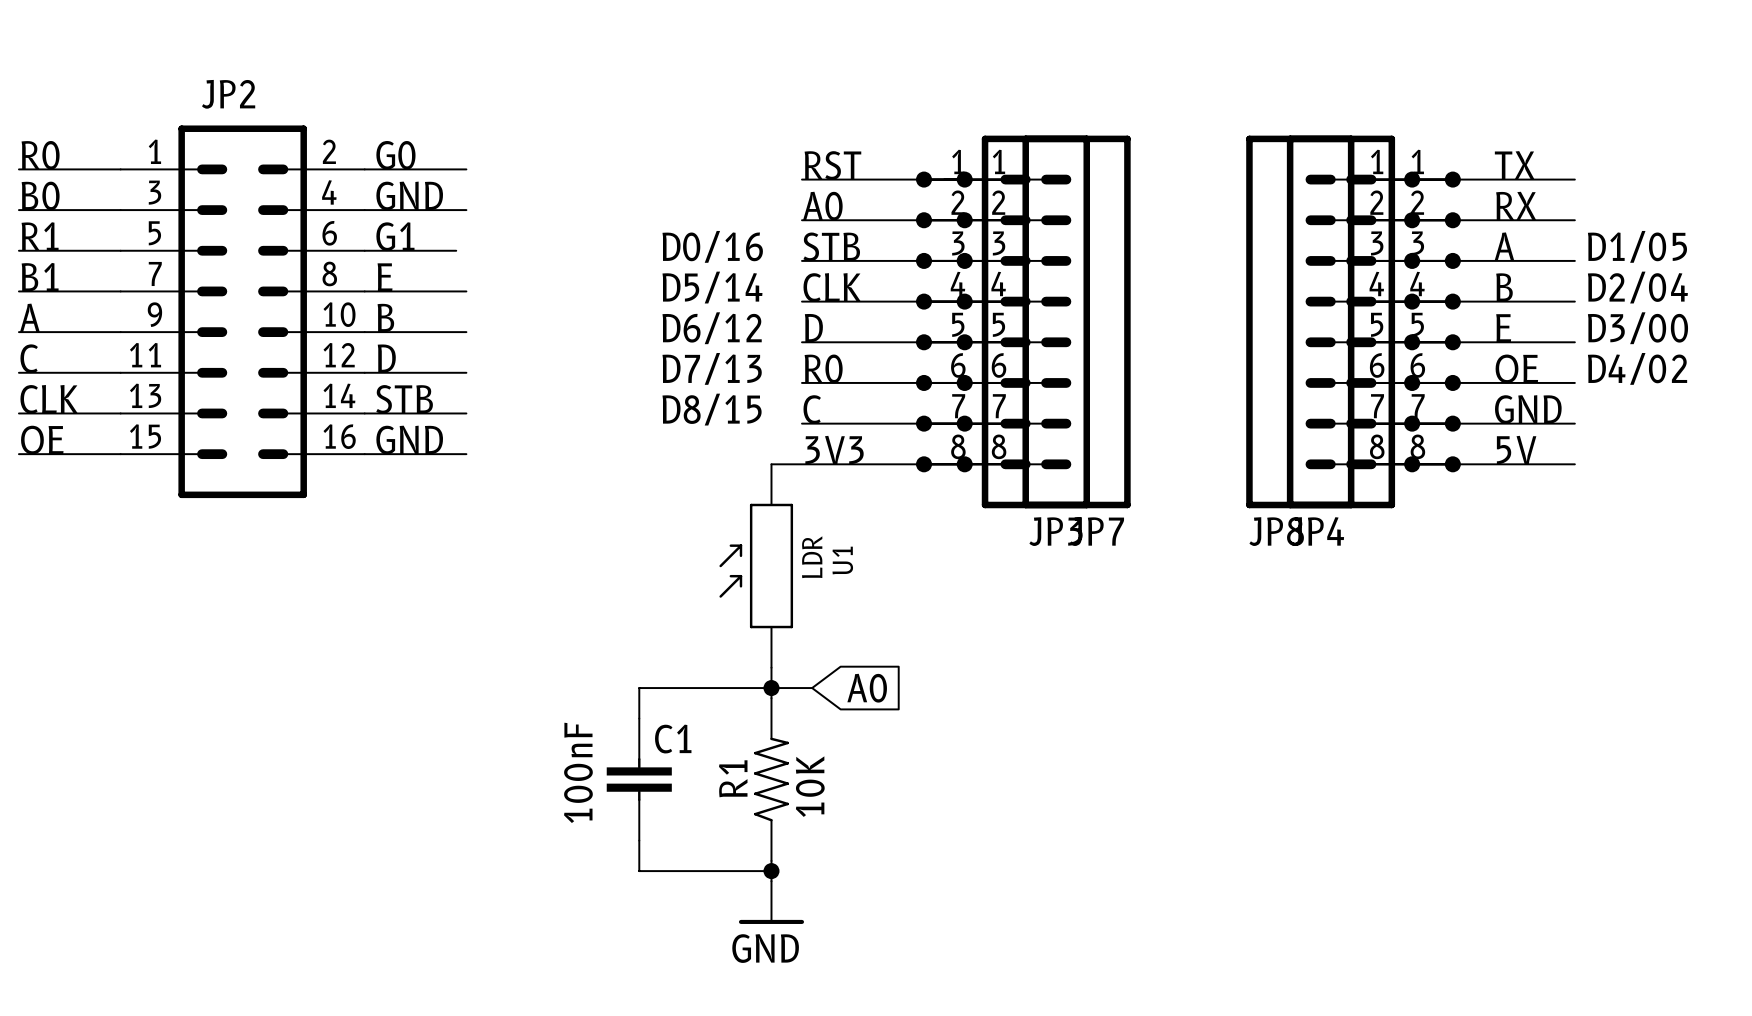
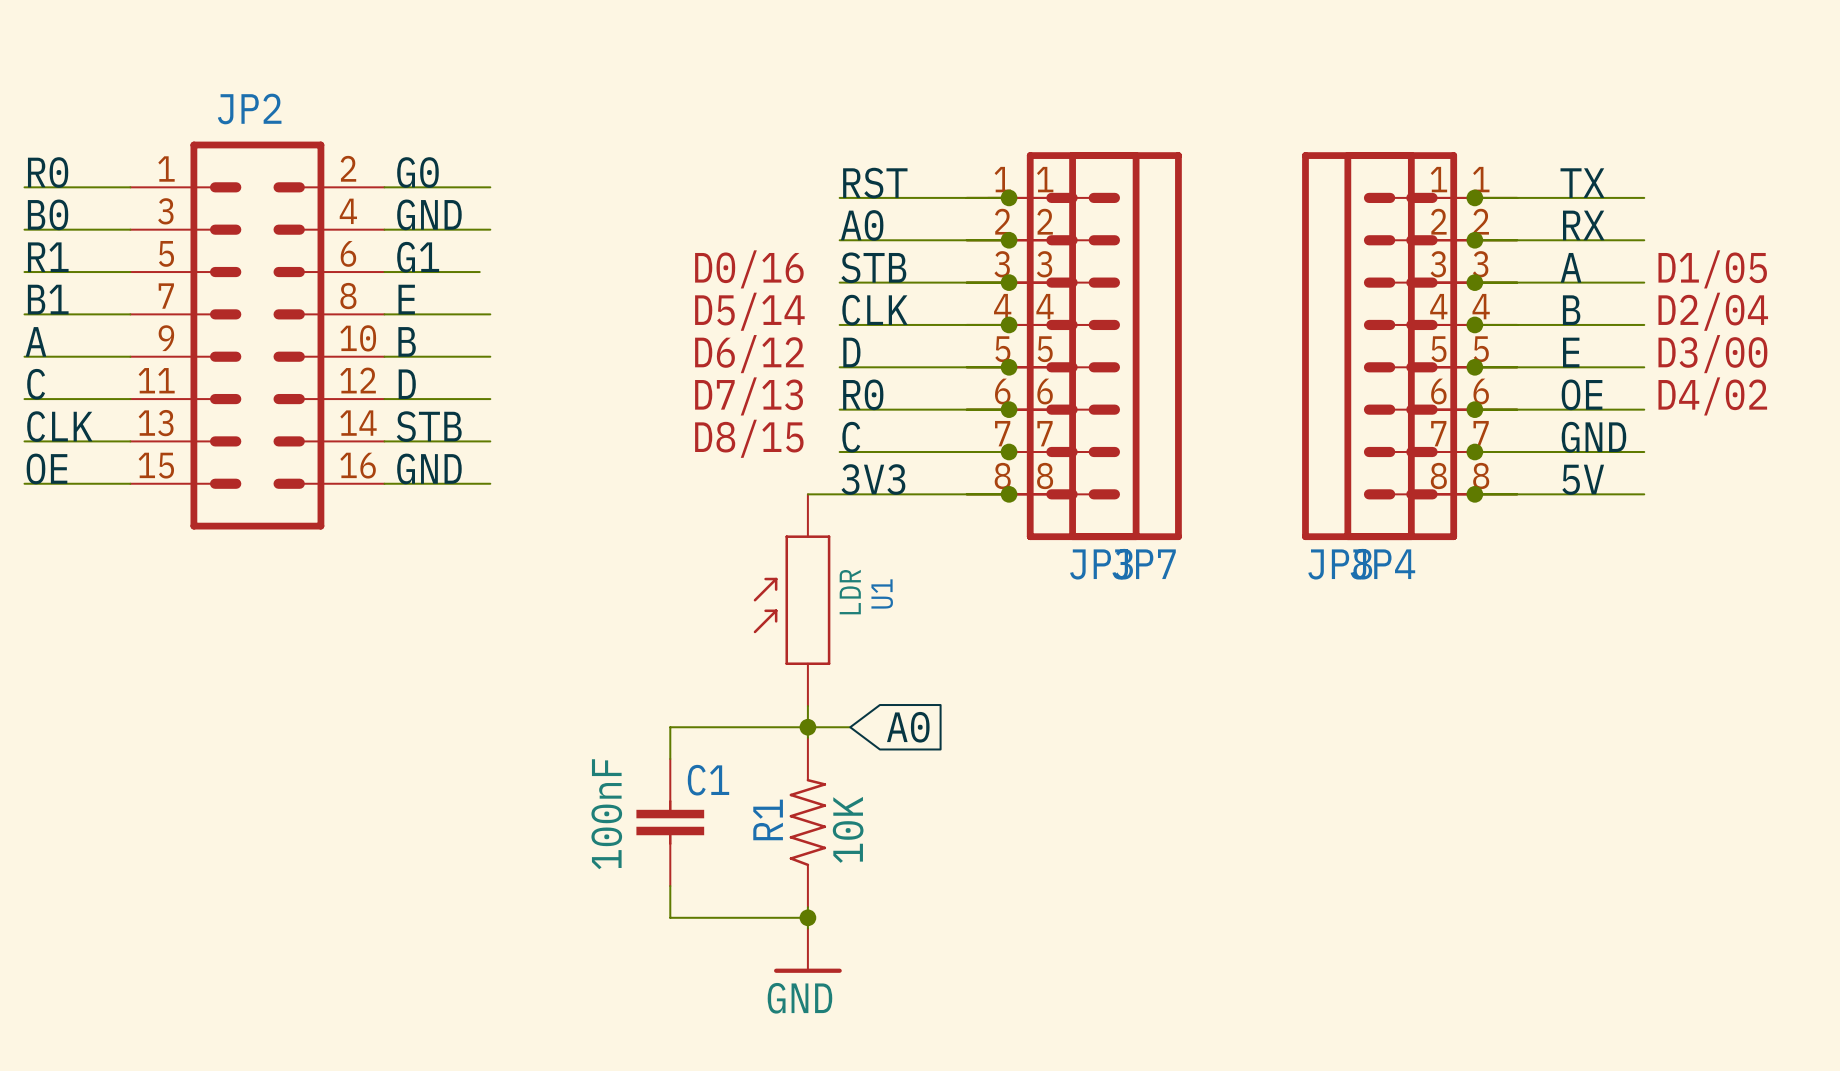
junction: (924, 179) -> none
junction: (1452, 179) -> none
junction: (924, 220) -> none
junction: (1452, 220) -> none
junction: (924, 260) -> none
junction: (1452, 260) -> none
junction: (924, 301) -> none
junction: (1452, 301) -> none
junction: (924, 342) -> none
junction: (1452, 342) -> none
junction: (924, 382) -> none
junction: (1452, 382) -> none
junction: (924, 423) -> none
junction: (1452, 423) -> none
junction: (924, 464) -> none
junction: (1452, 464) -> none

